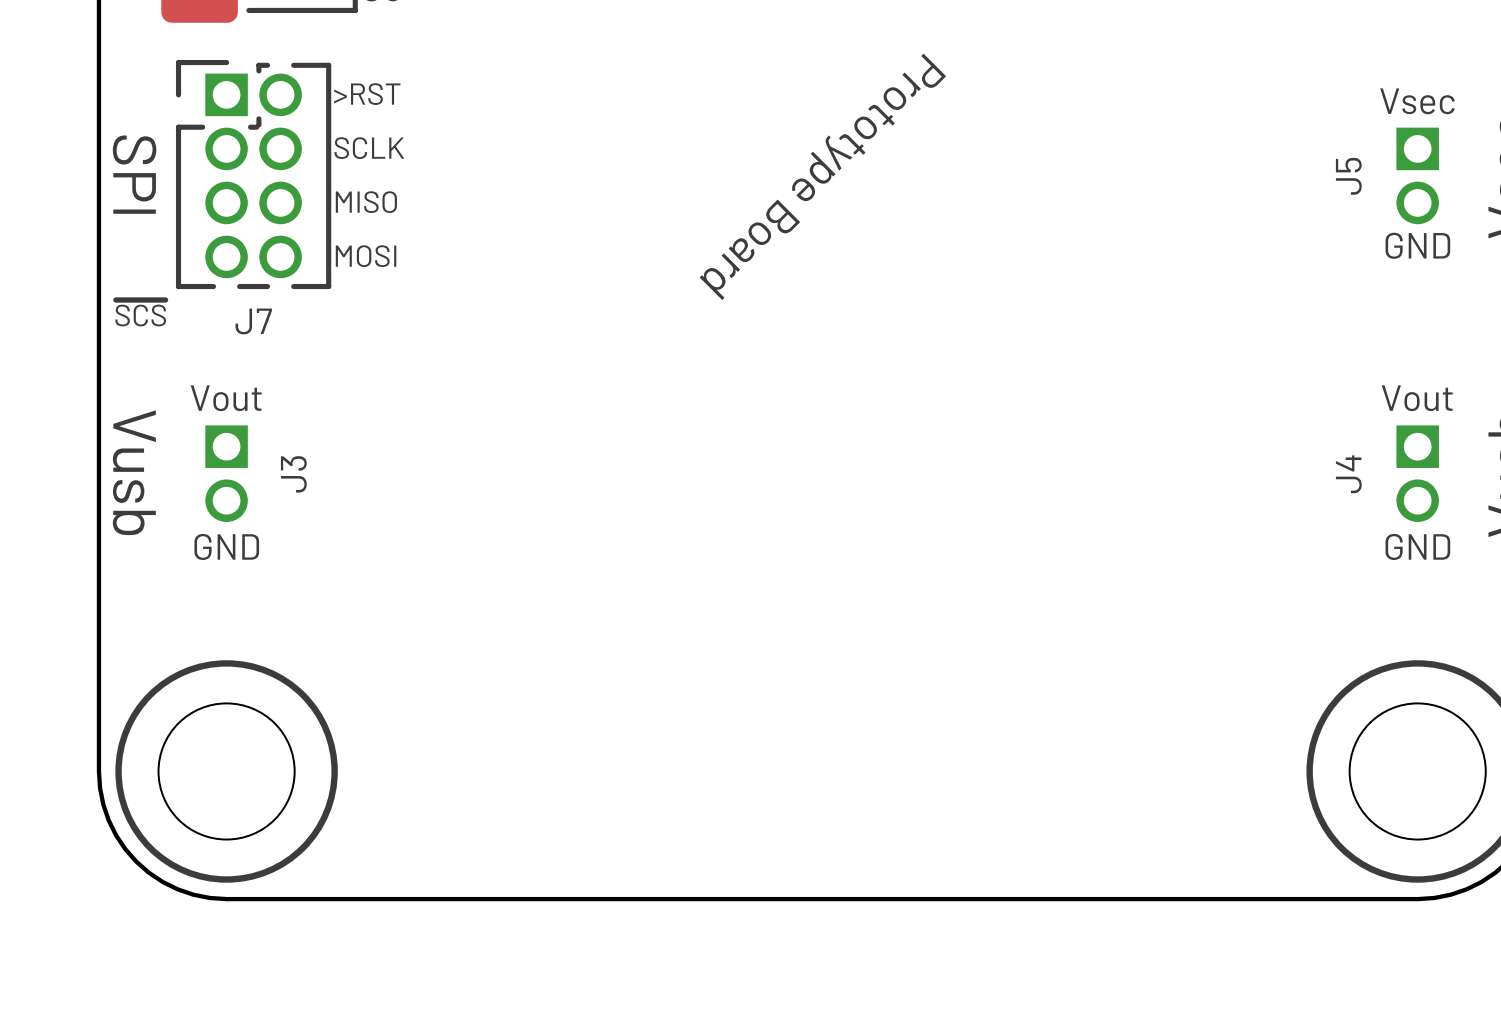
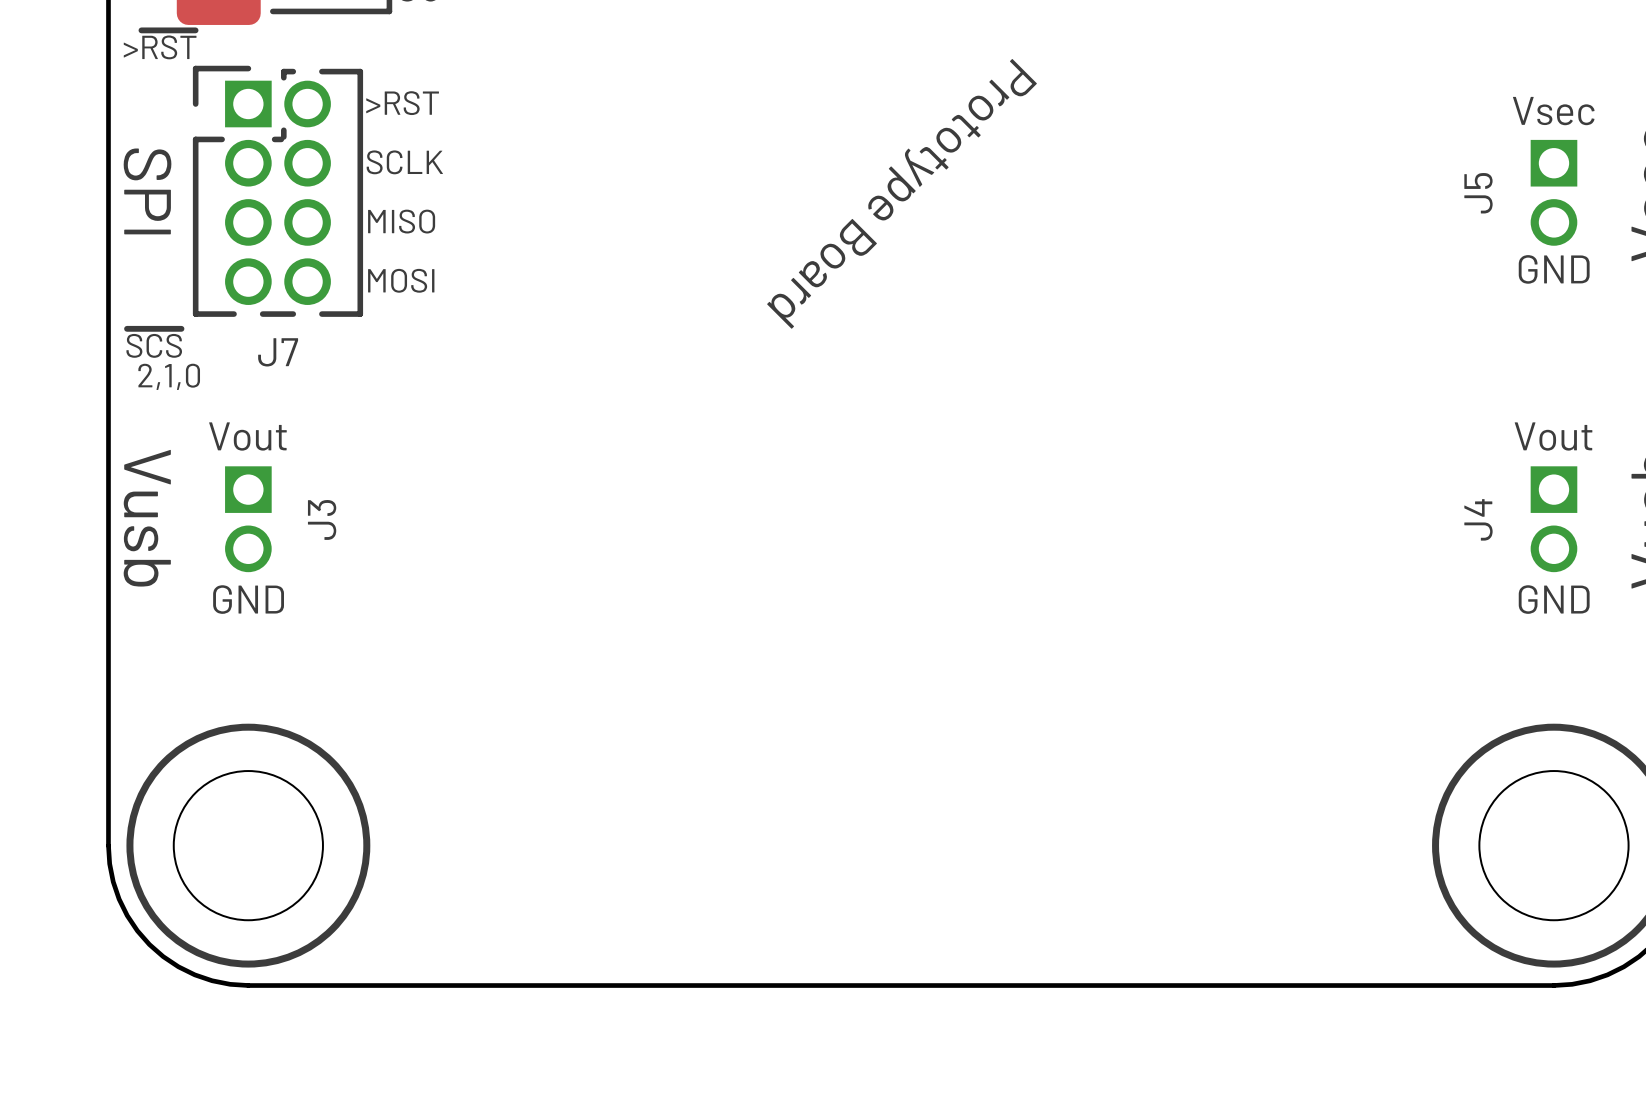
text: none -> >~{RST} (160, 44)
text: none -> 2,1,0 (169, 376)

